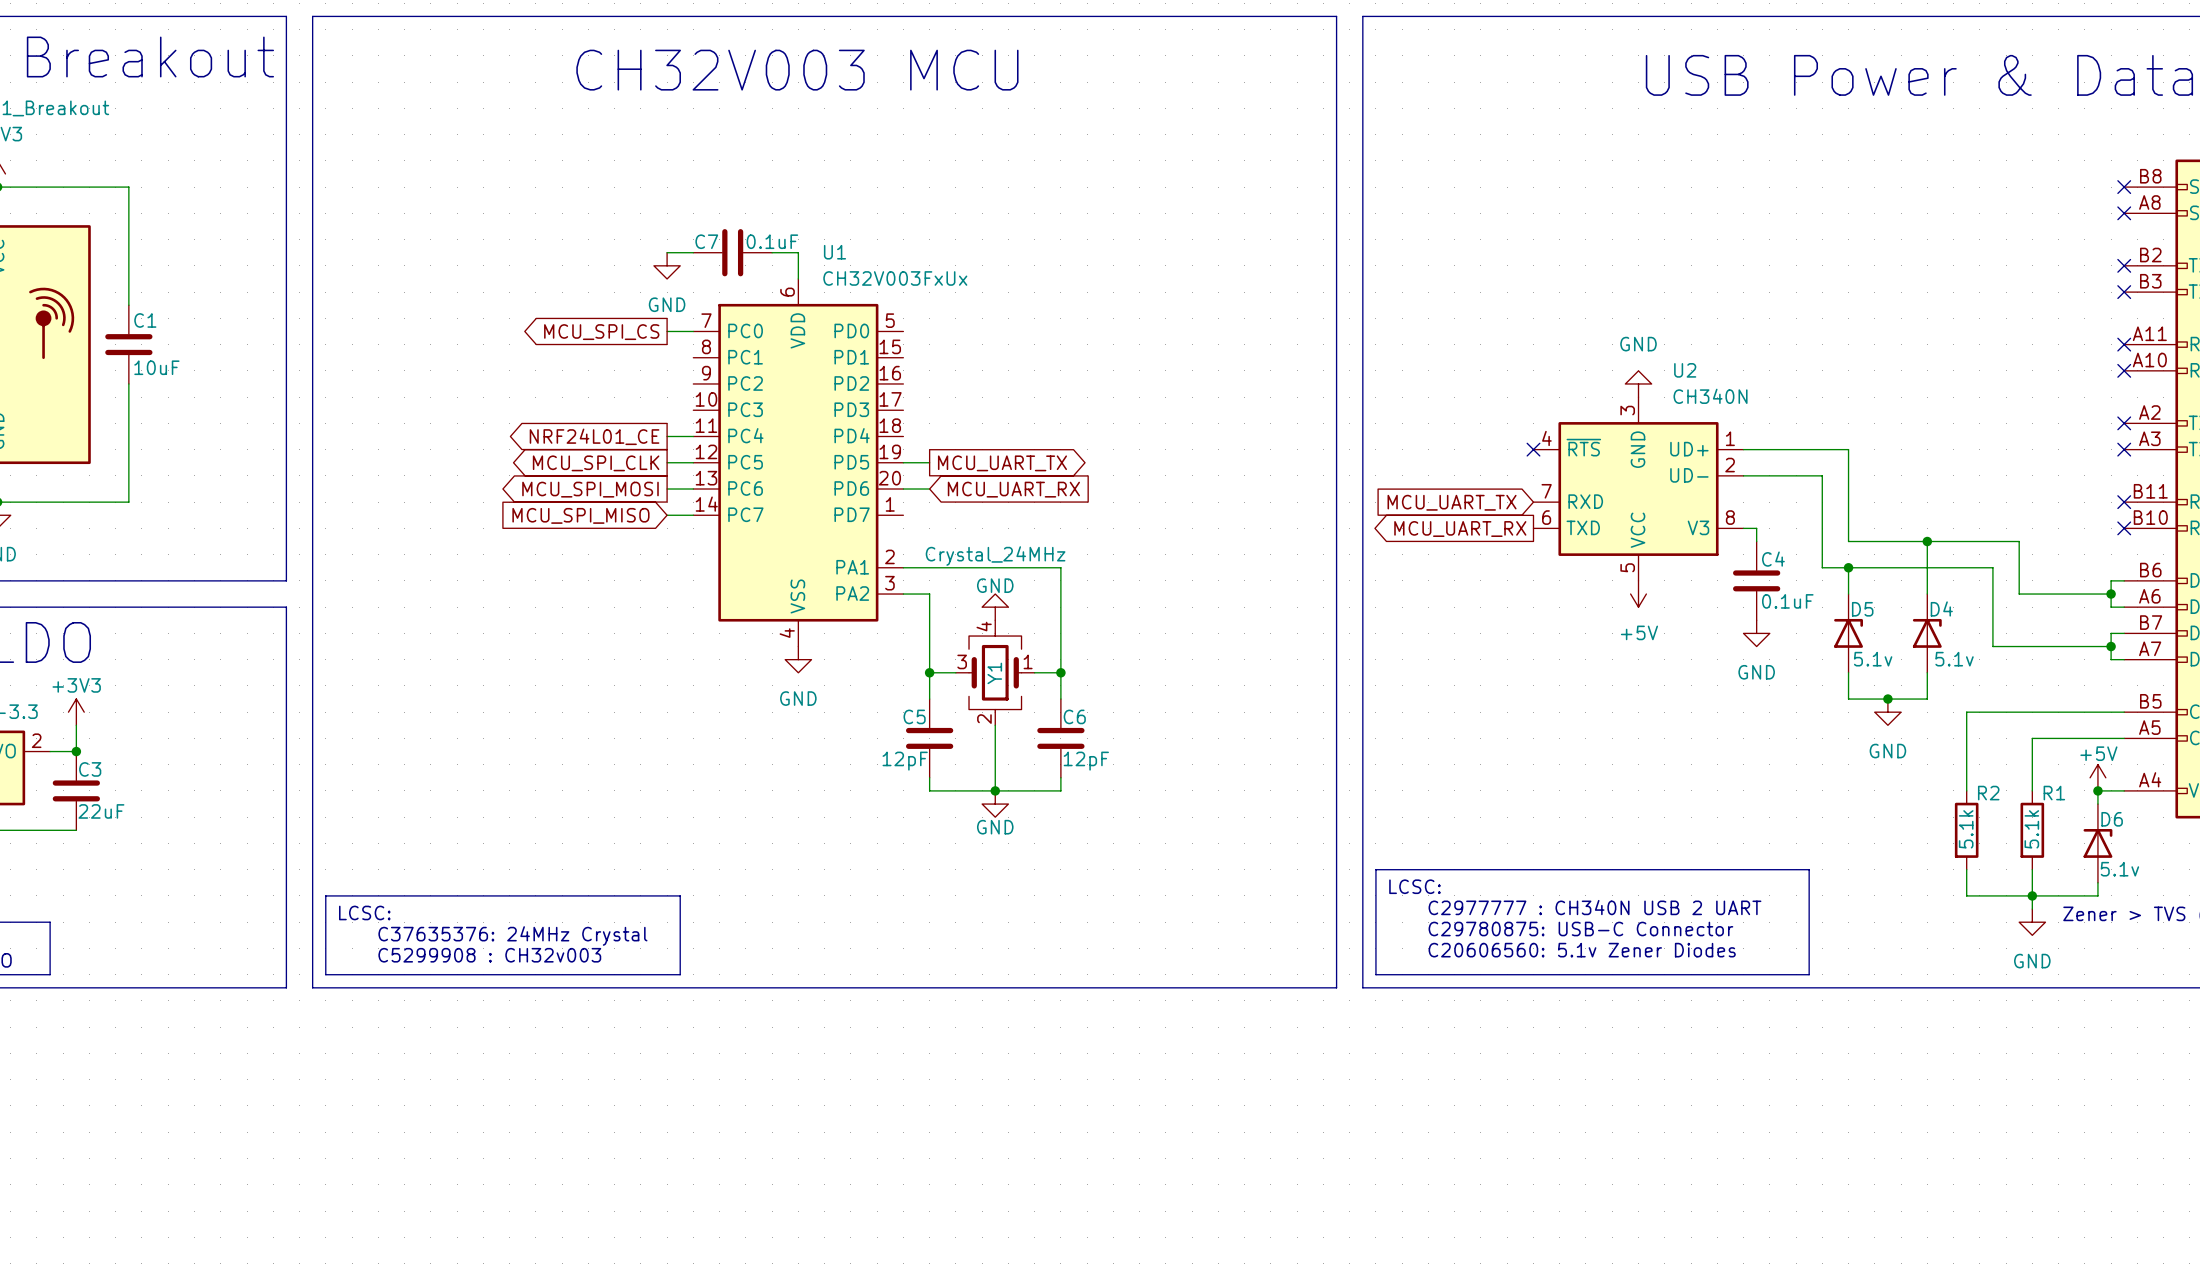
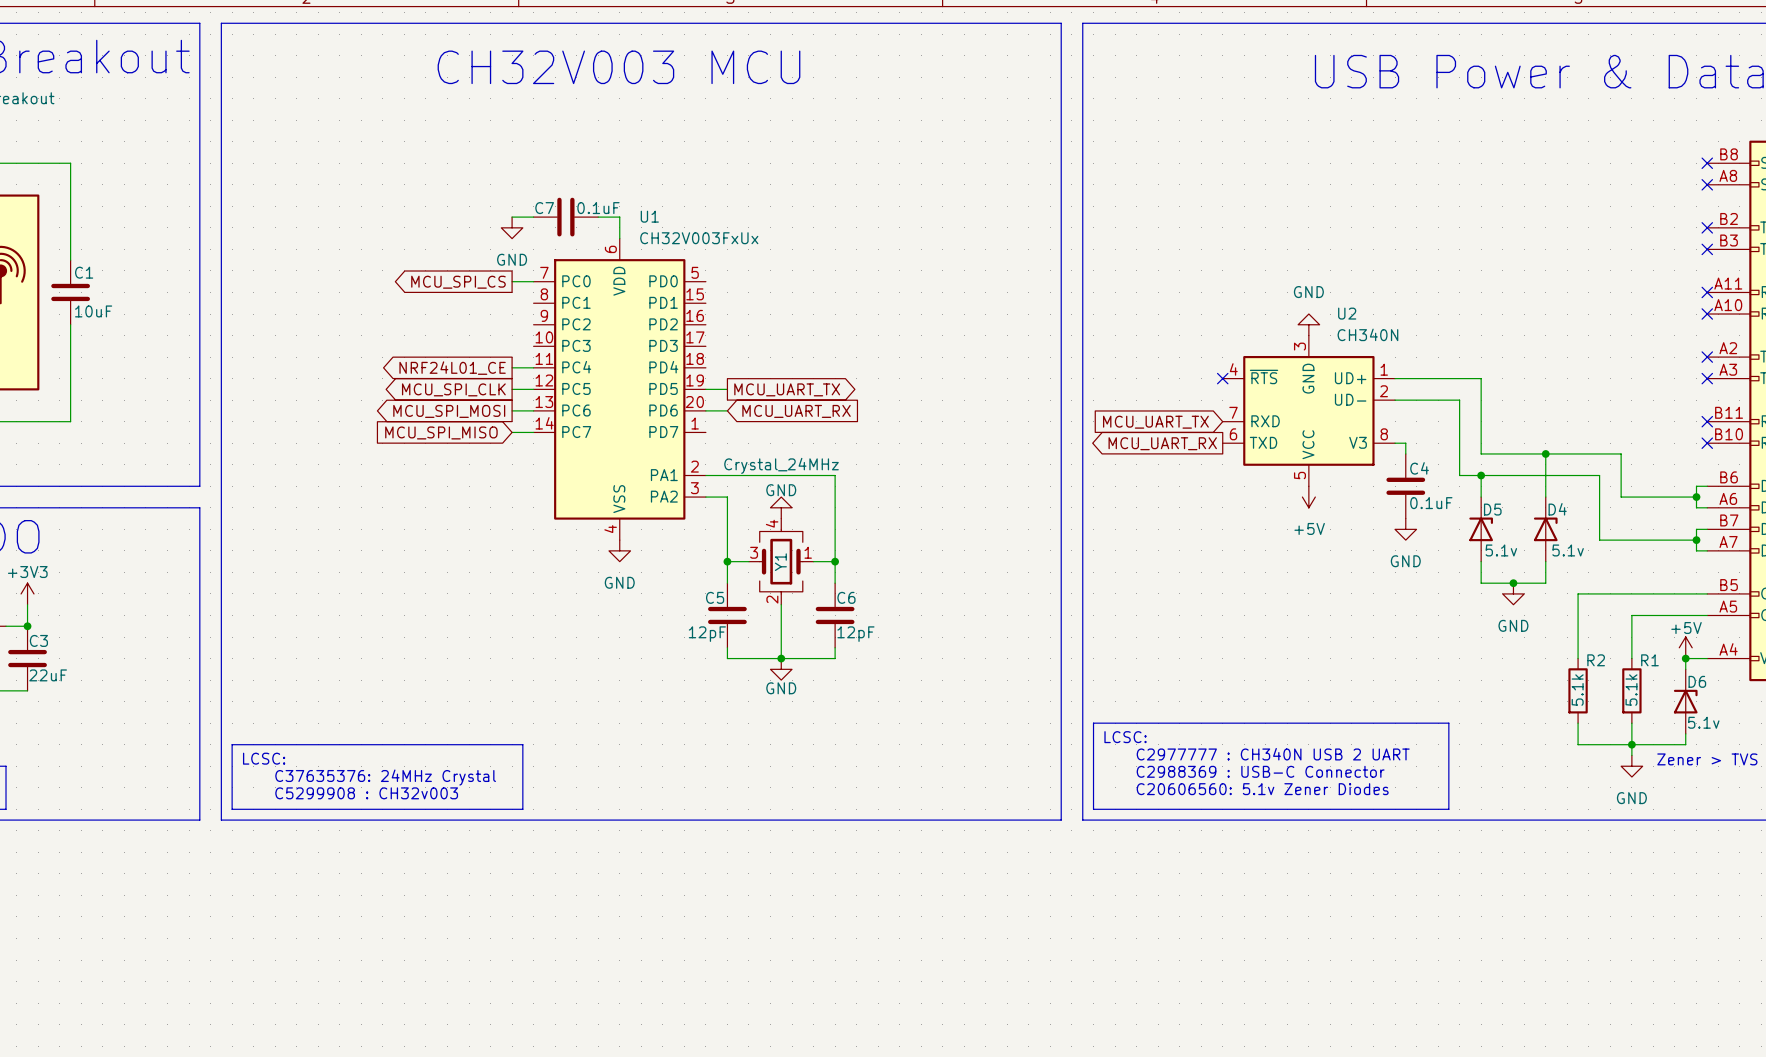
text: C29780875: USB-C Connector (1580, 929) -> C2988369 : USB-C Connector (1260, 771)

